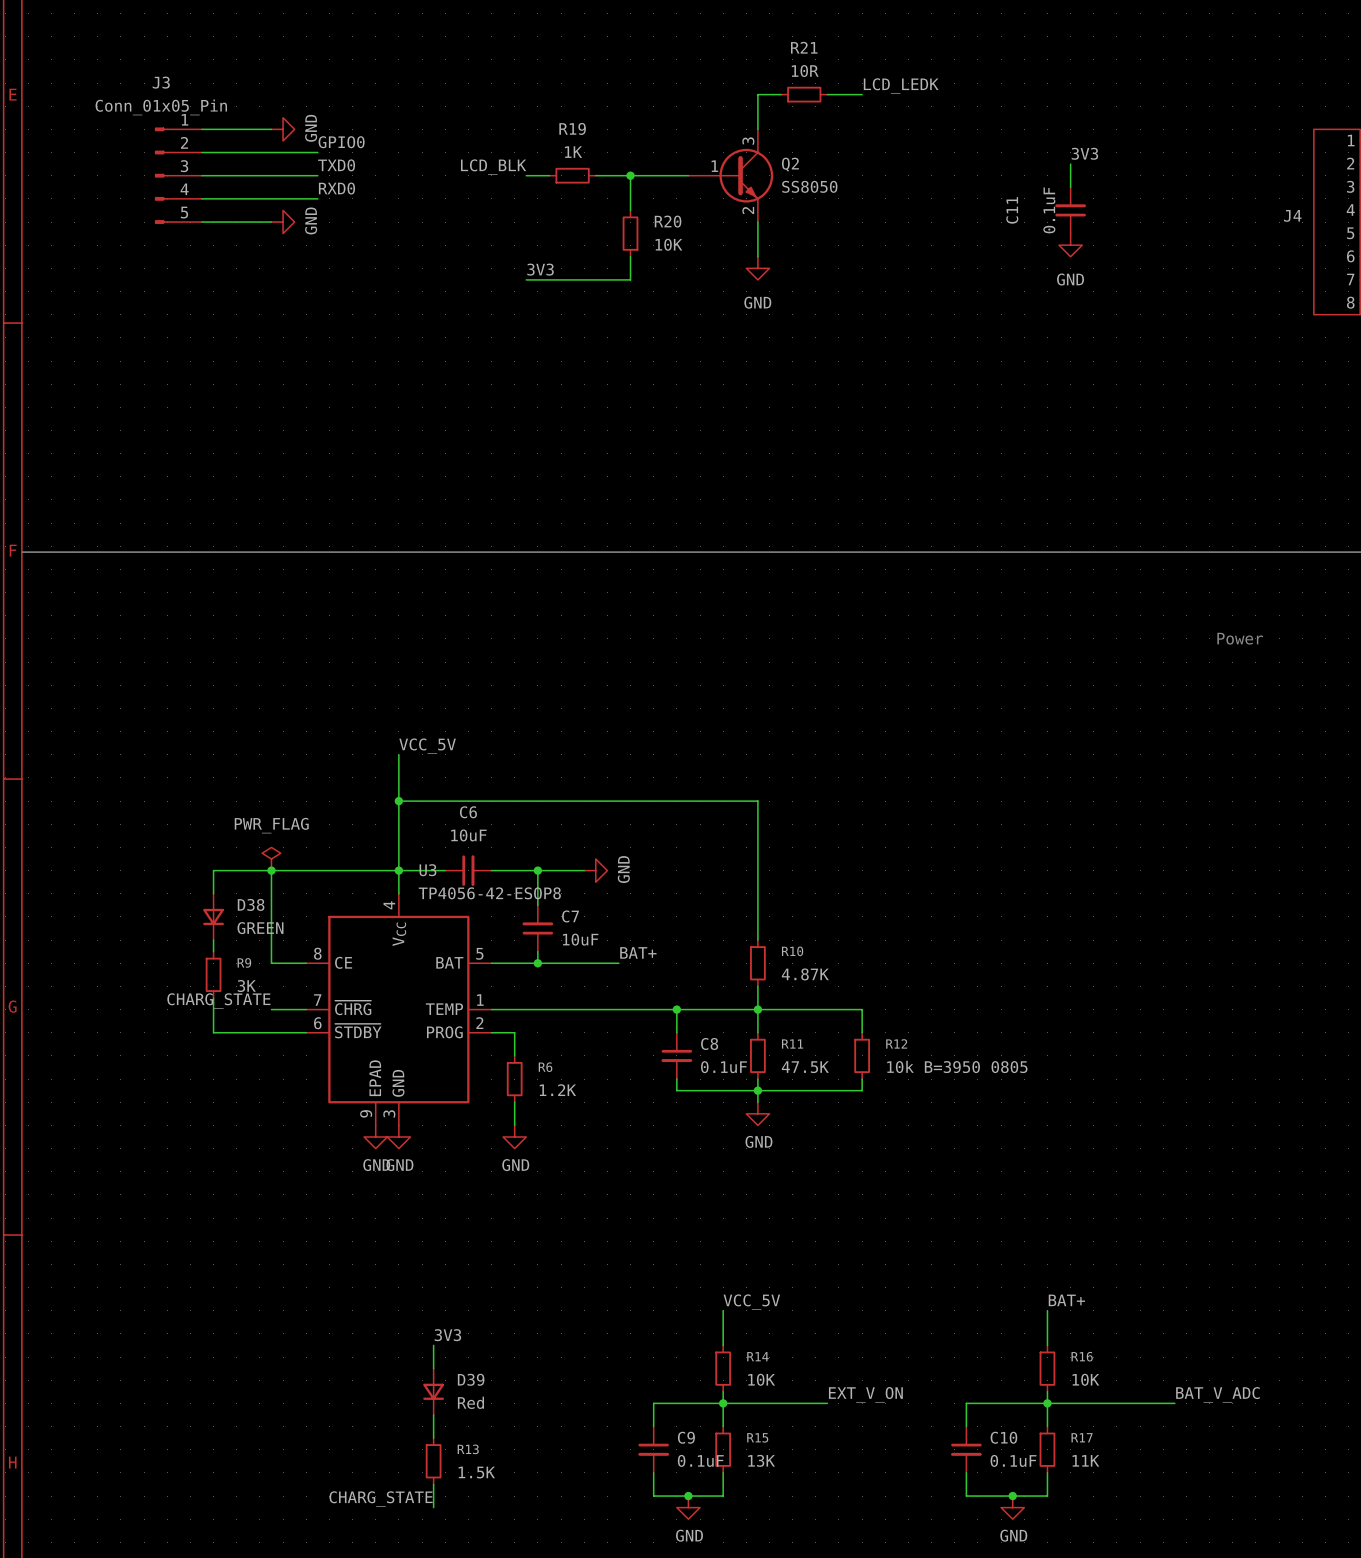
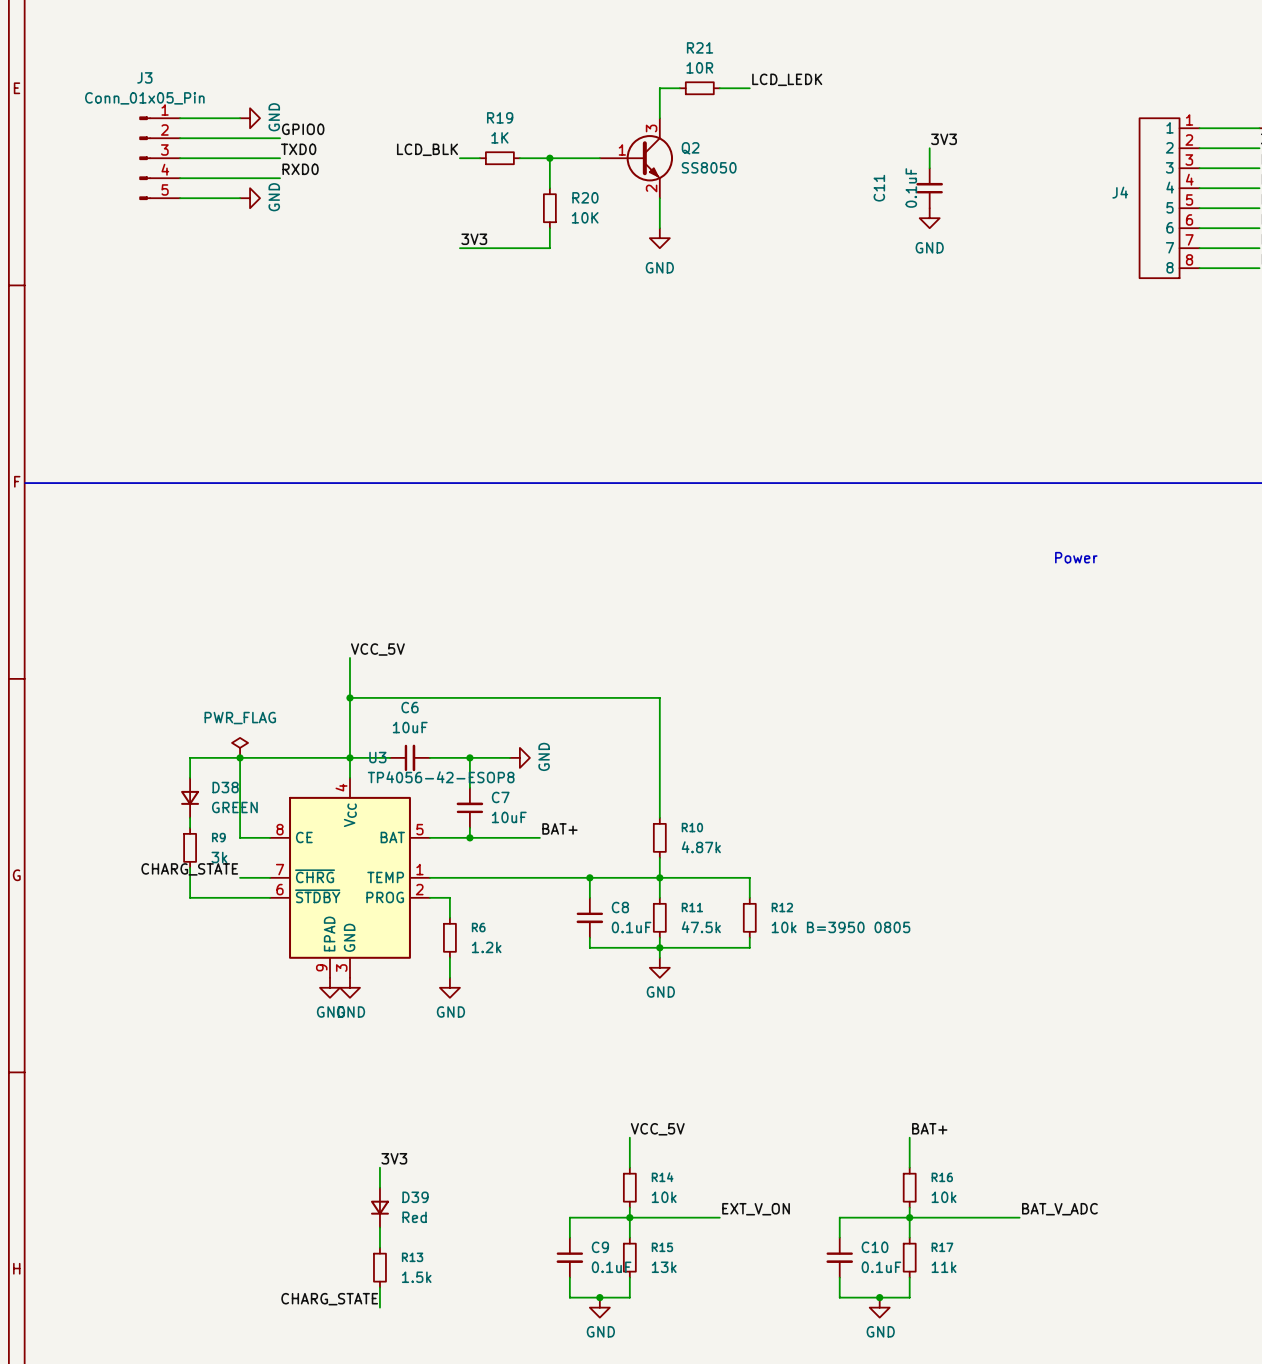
R10 value: 4.87K (805, 974) -> 4.87k (701, 847)
R9 value: 3K (246, 986) -> 3k (219, 857)
R11 value: 47.5K (805, 1067) -> 47.5k (701, 927)
R6 value: 1.2K (557, 1090) -> 1.2k (486, 947)
R14 value: 10K (761, 1379) -> 10k (664, 1197)
R16 value: 10K (1085, 1379) -> 10k (944, 1197)
R15 value: 13K (761, 1460) -> 13k (664, 1267)
R17 value: 11K (1085, 1460) -> 11k (944, 1267)
R13 value: 1.5K (476, 1472) -> 1.5k (416, 1277)

